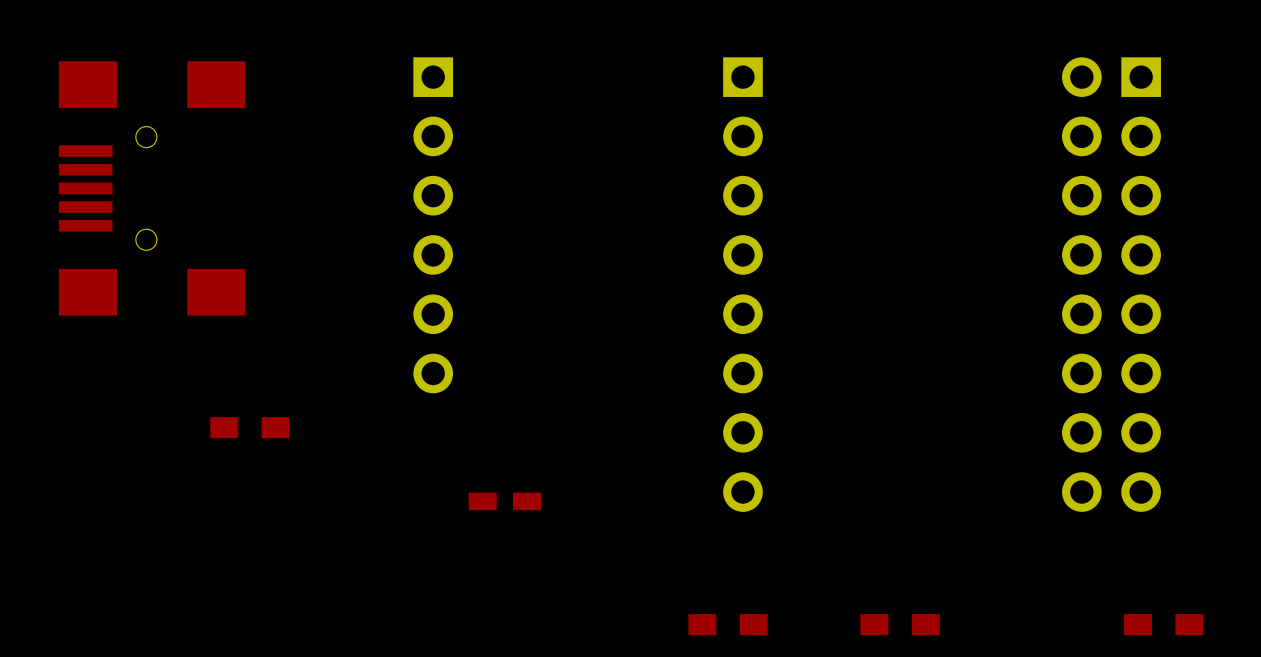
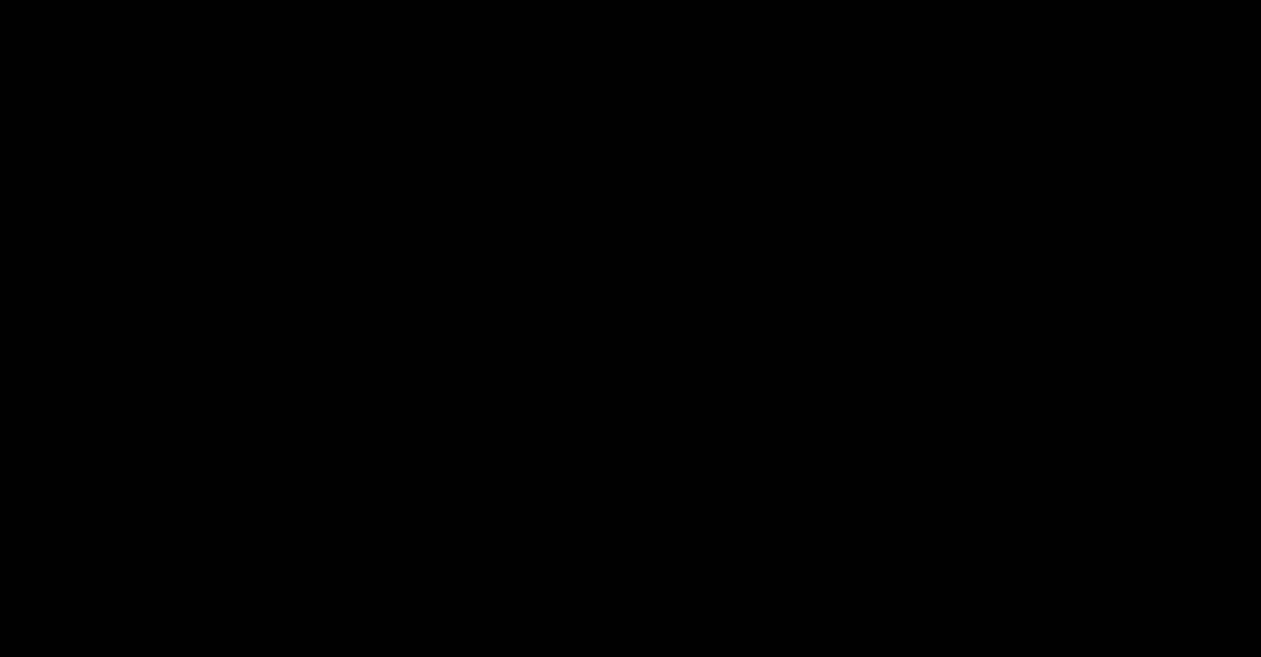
part: (152, 188) -> none
part: (433, 225) -> none
part: (742, 284) -> none
part: (1111, 284) -> none
part: (249, 427) -> none
part: (504, 501) -> none
part: (728, 624) -> none
part: (900, 624) -> none
part: (1163, 624) -> none

